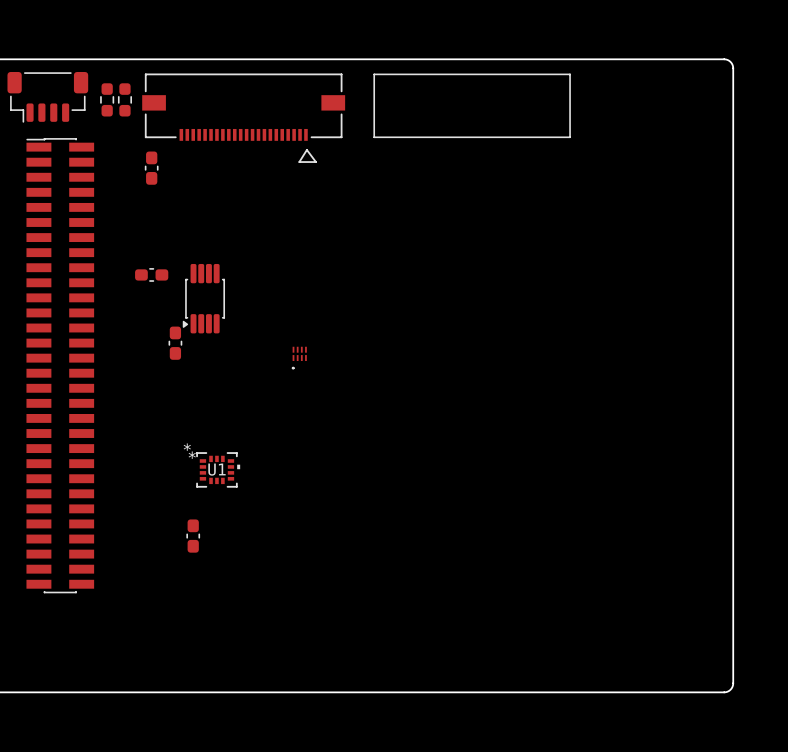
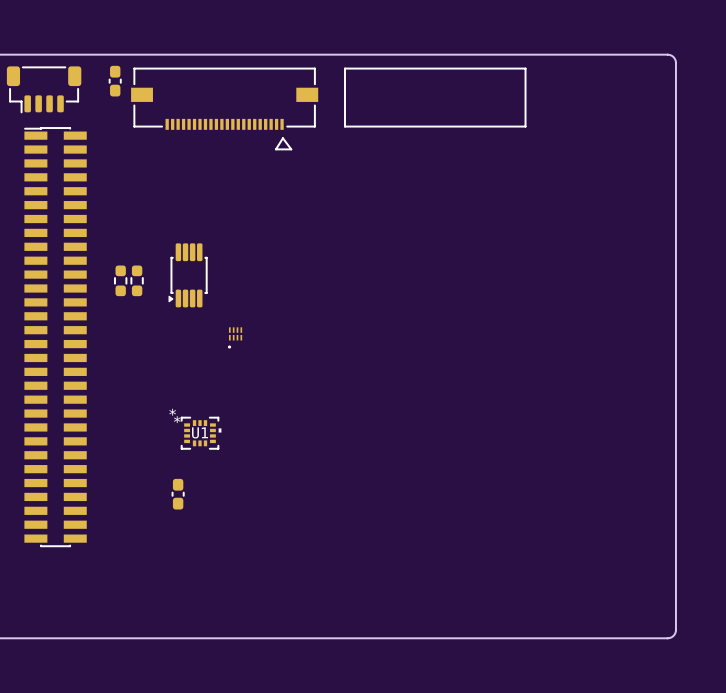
part: none -> (115, 81)
part: (107, 99) -> none
part: (124, 99) -> none
part: (151, 168) -> none
part: (151, 274) -> none
part: none -> (120, 280)
part: none -> (137, 280)
part: (175, 343) -> none
part position: (299, 358) -> (235, 337)

